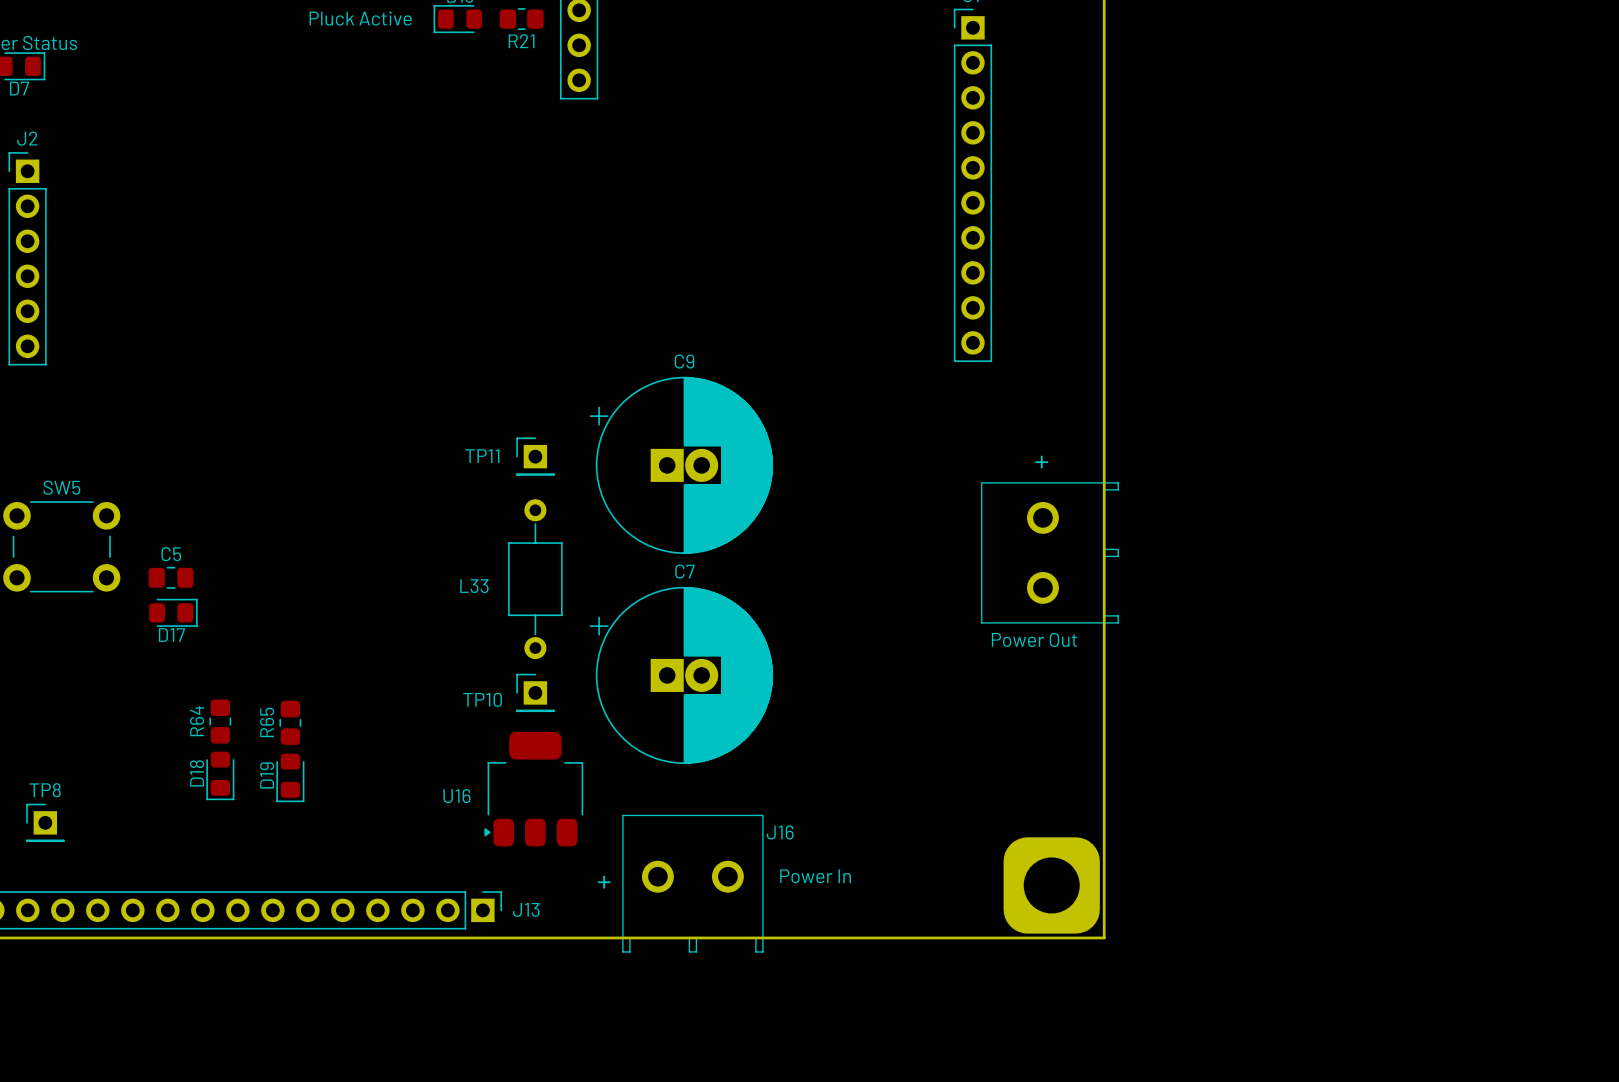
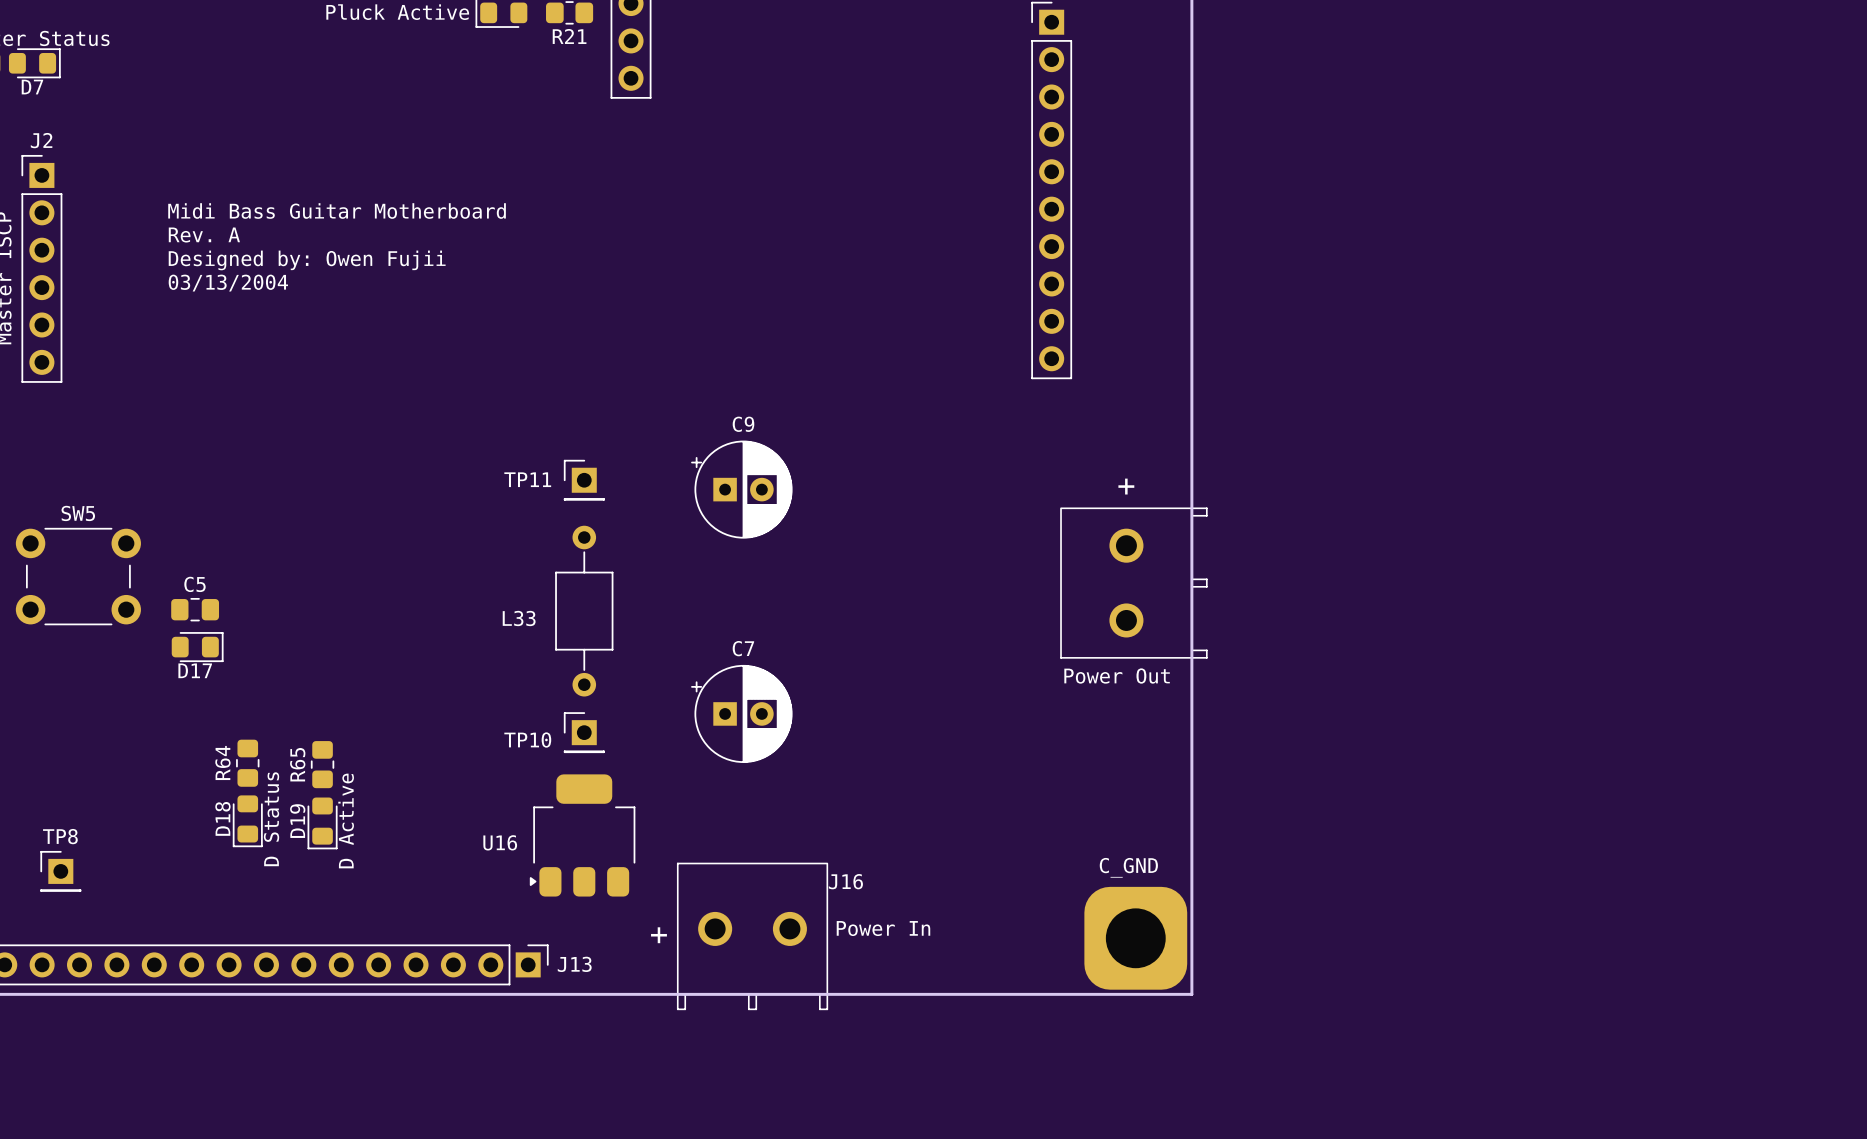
text: none -> Midi Bass Guitar Motherboard (337, 211)
text: none -> Rev. A (204, 235)
text: none -> Designed by: Owen Fujii (307, 260)
text: none -> 03/13/2004 (228, 283)
C9 name position: C9 (684, 361) -> C9 (743, 424)
C9 footprint: [589, 376, 774, 555] -> [691, 440, 793, 539]
C7 name position: C7 (684, 571) -> C7 (743, 648)
C7 footprint: [589, 586, 774, 765] -> [691, 664, 793, 763]
D18 value: none -> D Status (271, 819)
D19 value: none -> D Active (346, 820)
text: none -> C_GND (1128, 867)

